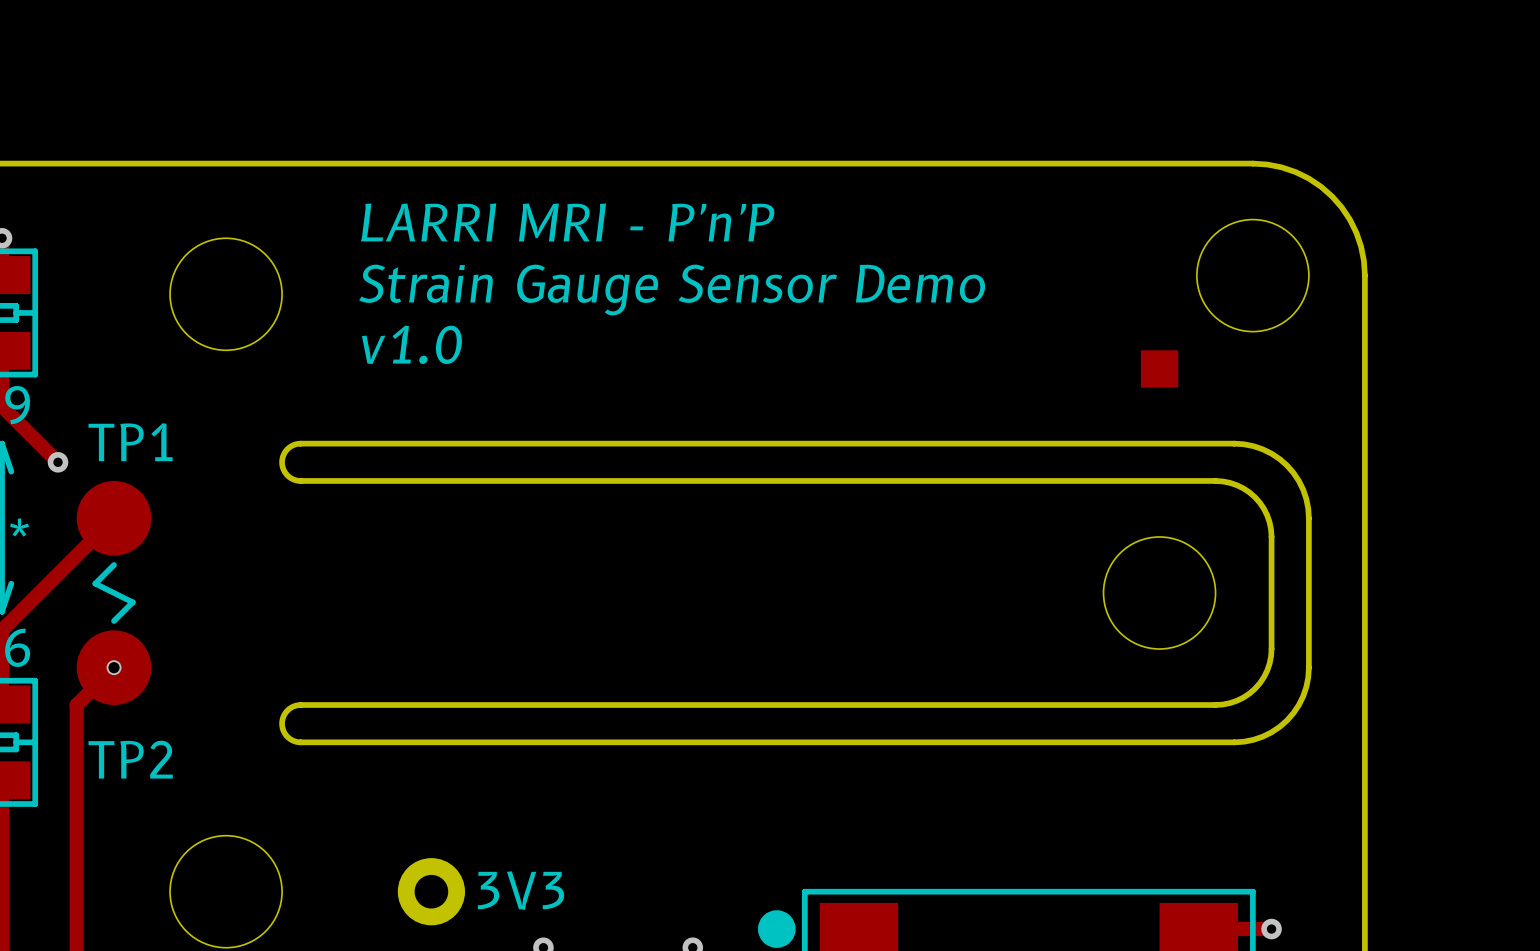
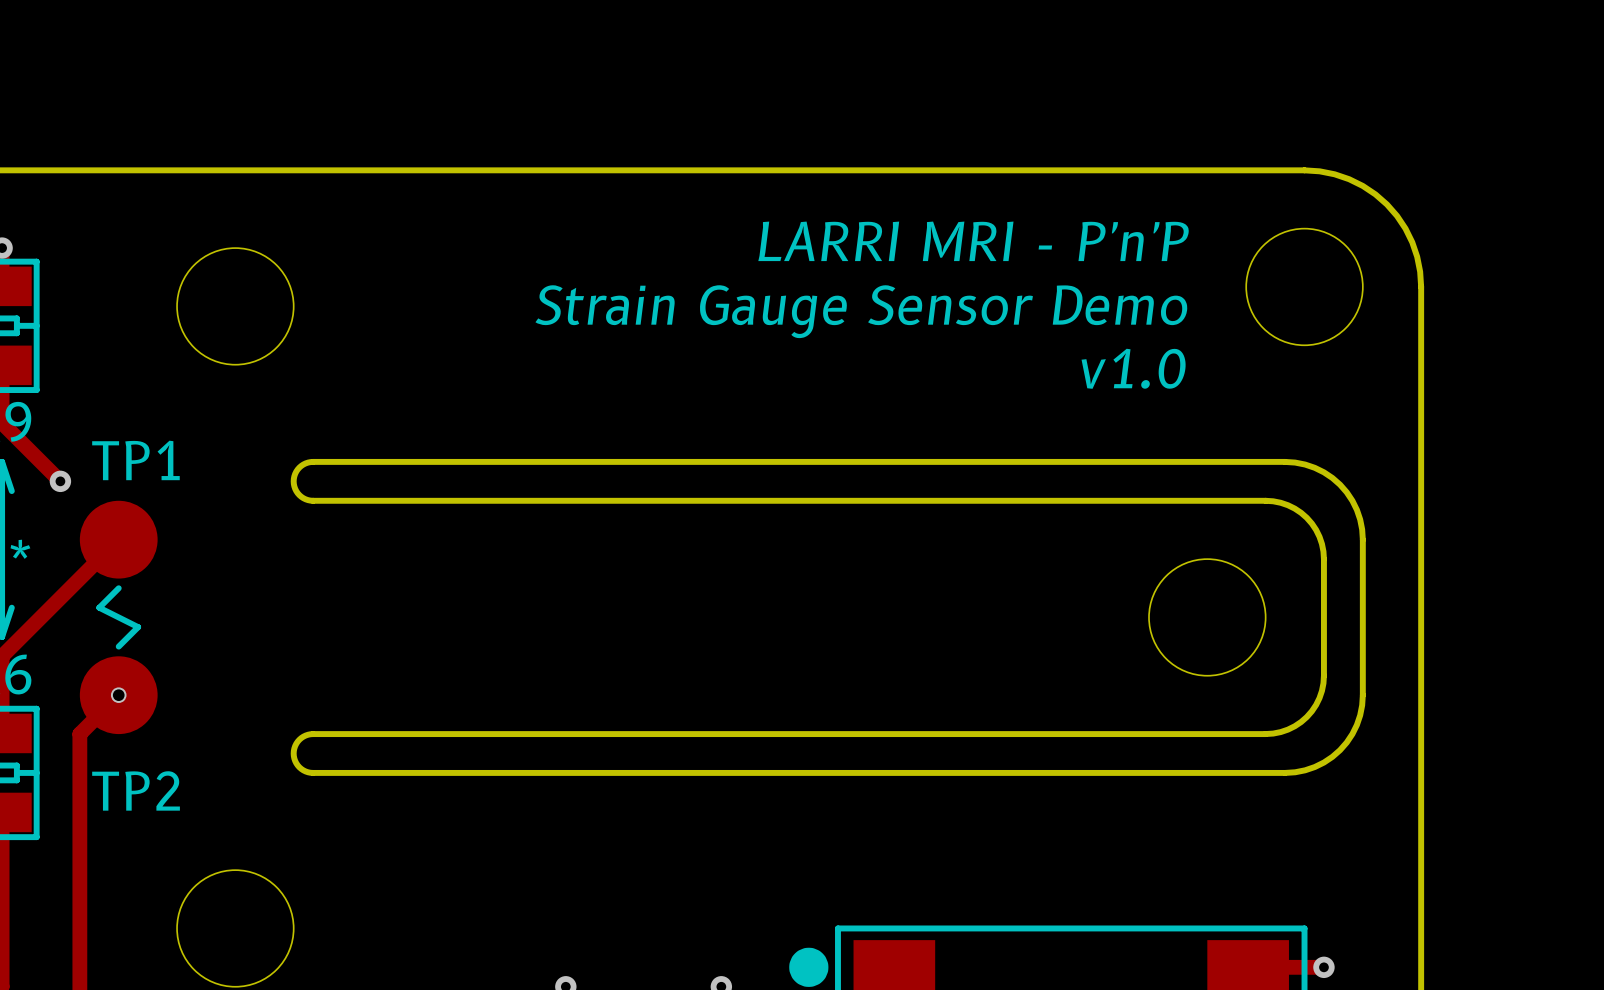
text position: LARRI MRI - P'n'P (567, 222) -> LARRI MRI - P'n'P (973, 241)
text position: Strain Gauge Sensor Demo (672, 290) -> Strain Gauge Sensor Demo (861, 311)
text position: v1.0 (411, 344) -> v1.0 (1133, 368)
part: (1159, 368) -> none
3V3: (431, 891) -> none

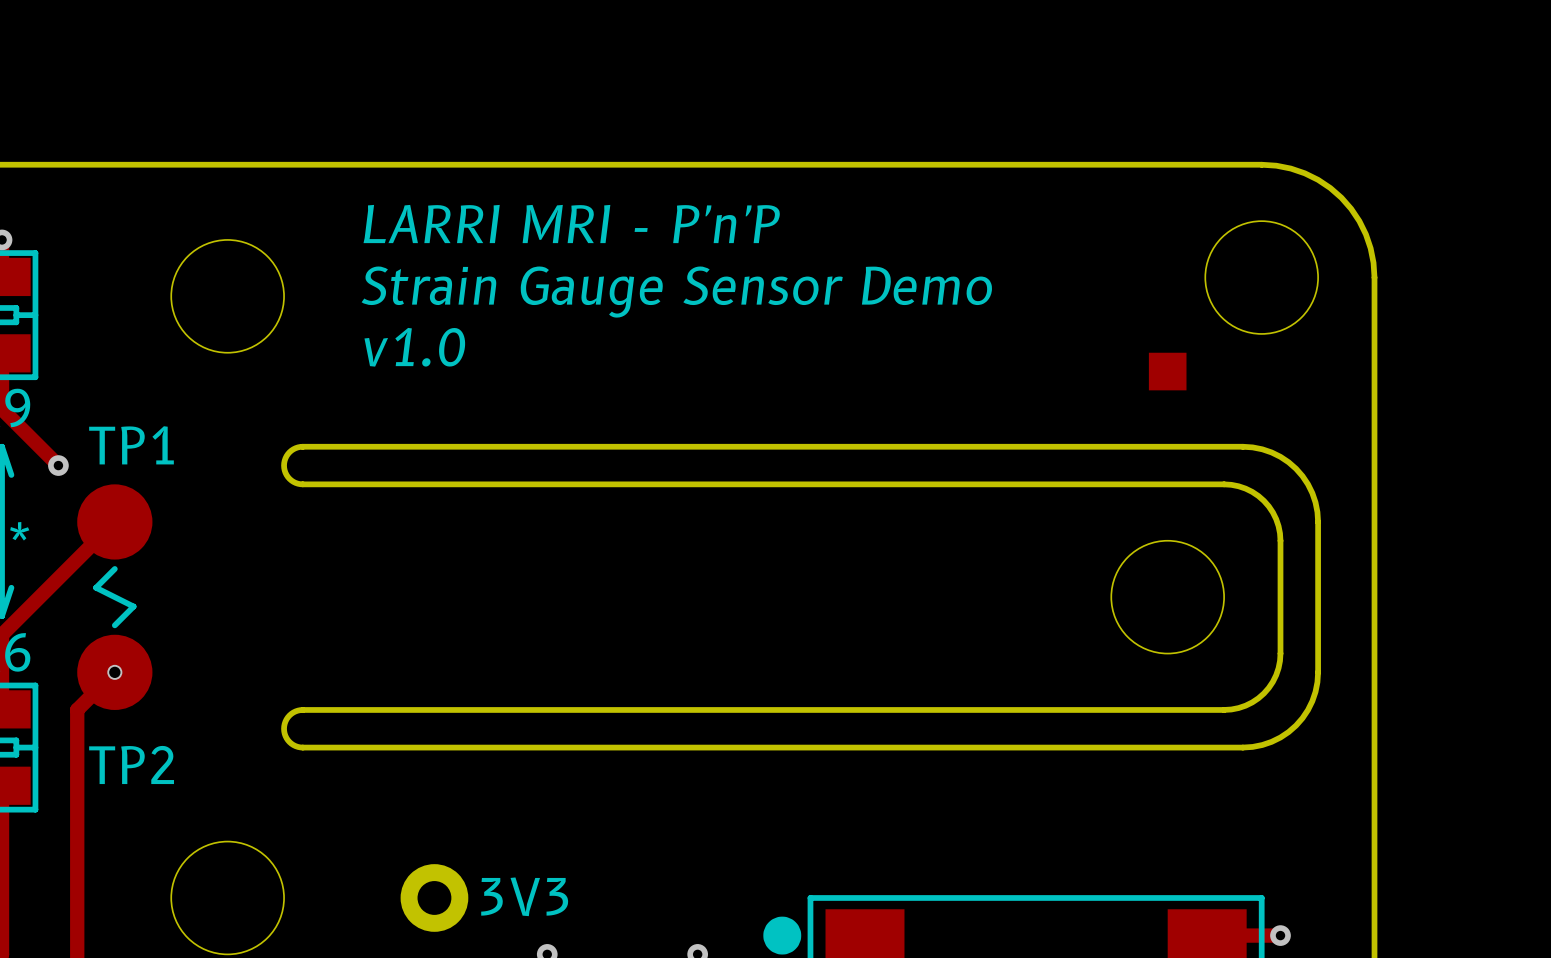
text position: LARRI MRI - P'n'P (973, 241) -> LARRI MRI - P'n'P (571, 224)
text position: Strain Gauge Sensor Demo (861, 311) -> Strain Gauge Sensor Demo (676, 292)
text position: v1.0 (1133, 368) -> v1.0 (414, 347)
part: none -> (1167, 371)
3V3: none -> (434, 897)

